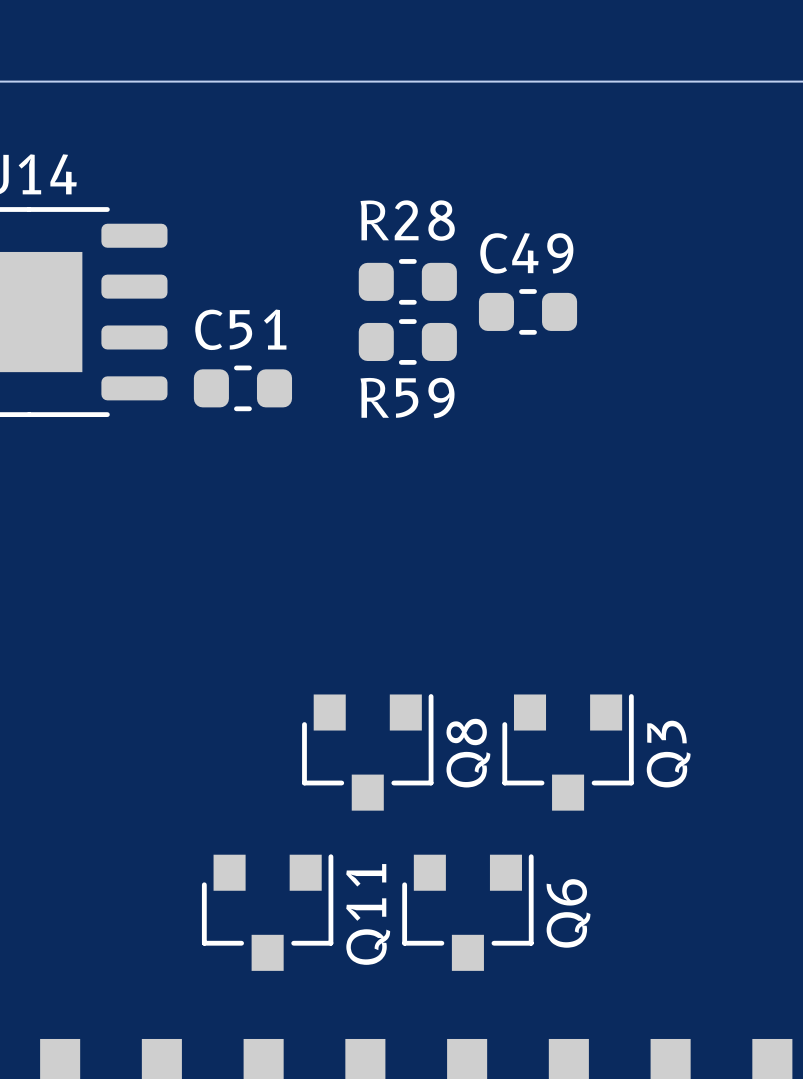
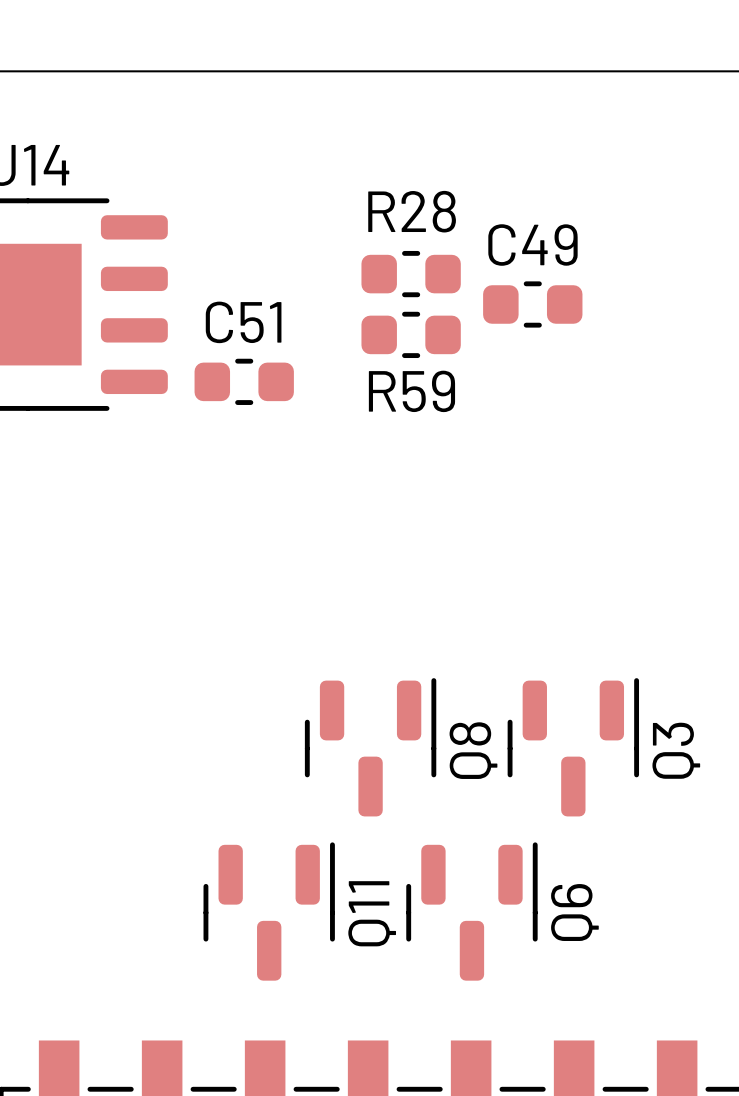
Q8 footprint: [302, 694, 434, 811] -> [304, 678, 437, 817]
Q3 footprint: [502, 694, 634, 811] -> [507, 678, 640, 817]
Q11 footprint: [201, 854, 334, 971] -> [203, 842, 335, 981]
Q6 footprint: [402, 854, 534, 971] -> [406, 842, 538, 981]

